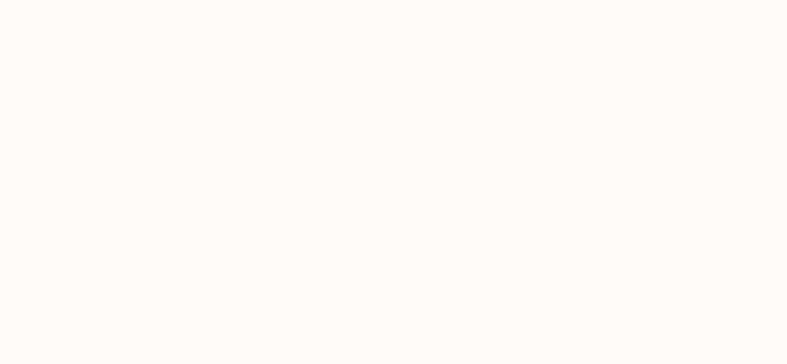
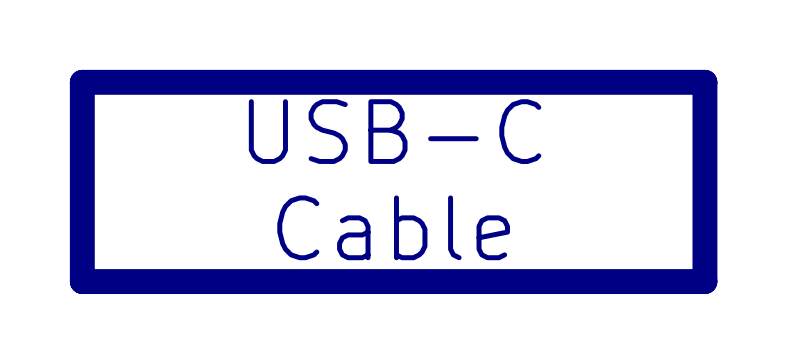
line: none -> (82, 82) (82, 281) (704, 281) (704, 82) (82, 82)
text: none -> USB-C (395, 131)
text: none -> Cable (393, 227)

